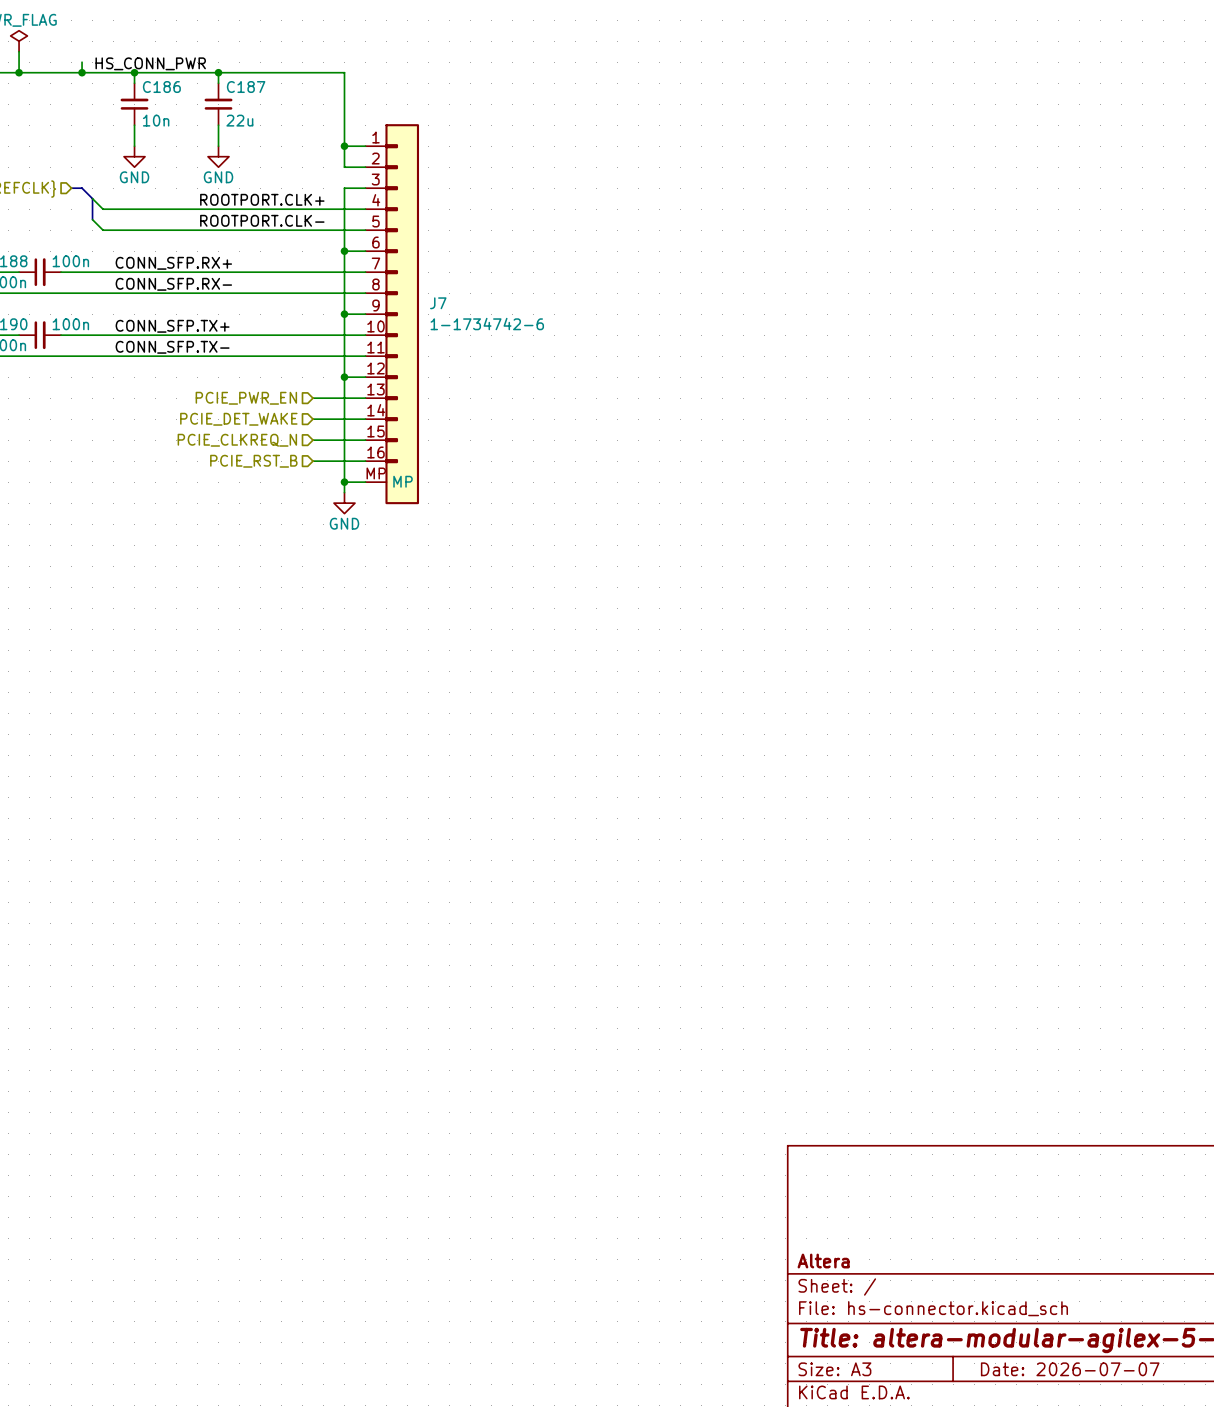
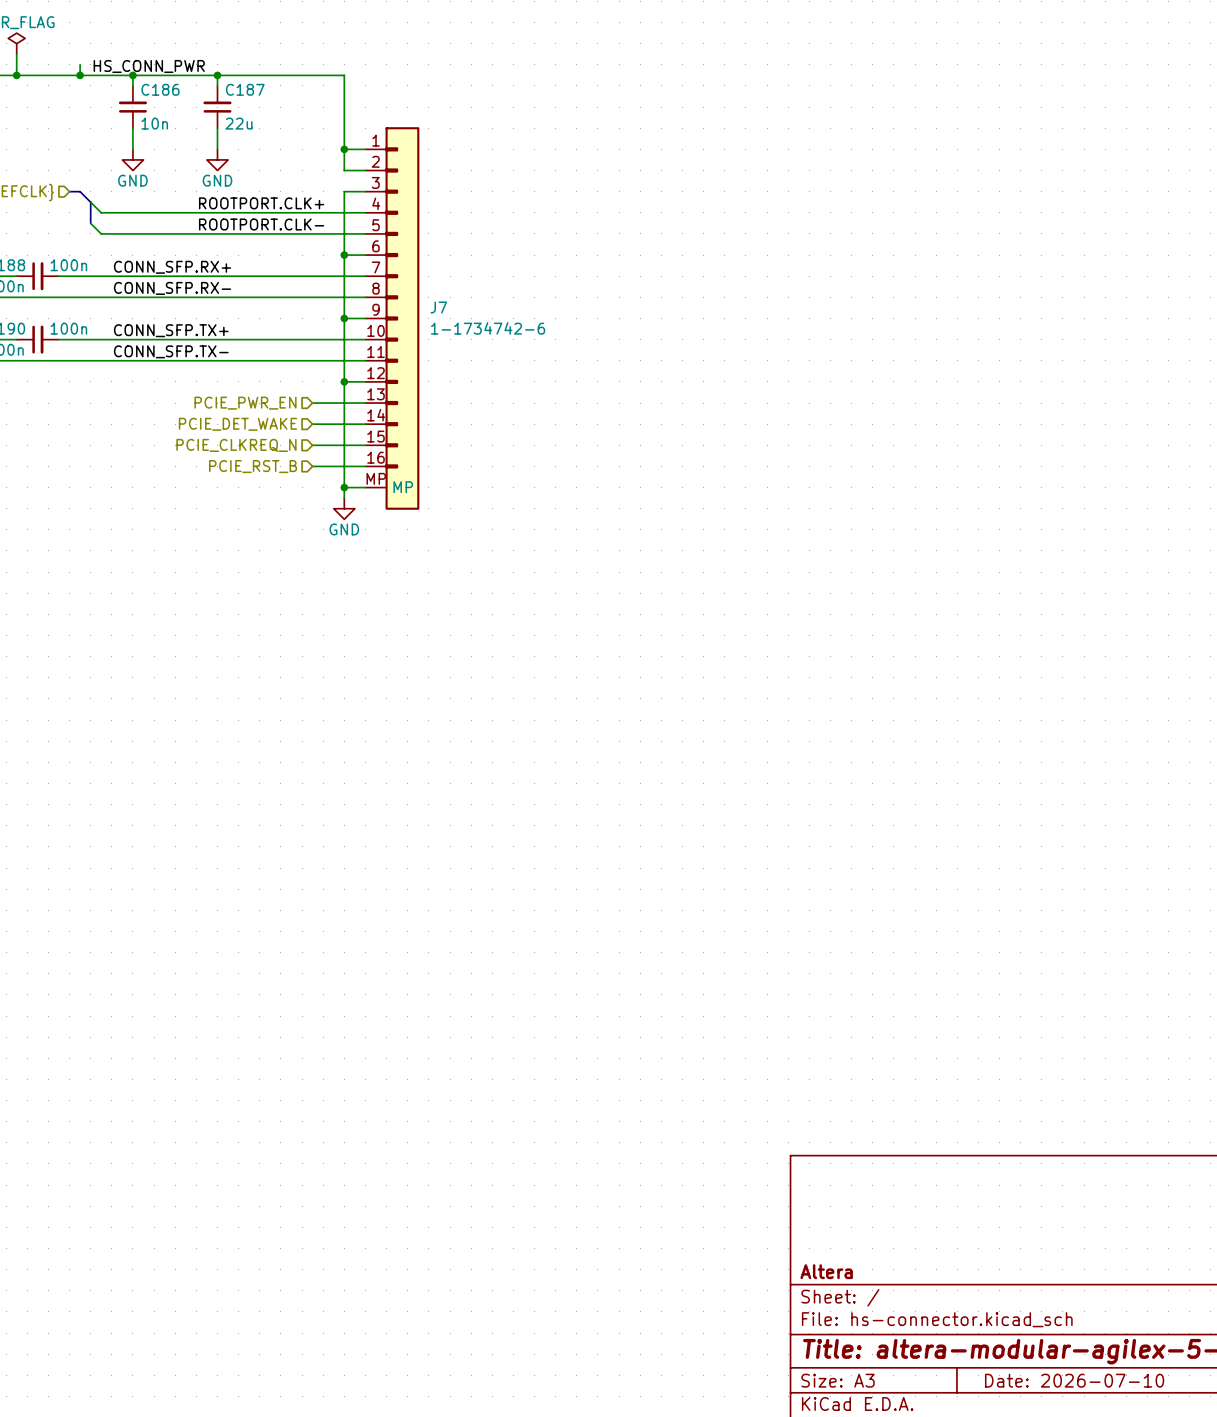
title block: Date: 2026-07-07 (1070, 1369) -> Date: 2026-07-10 (1074, 1380)

